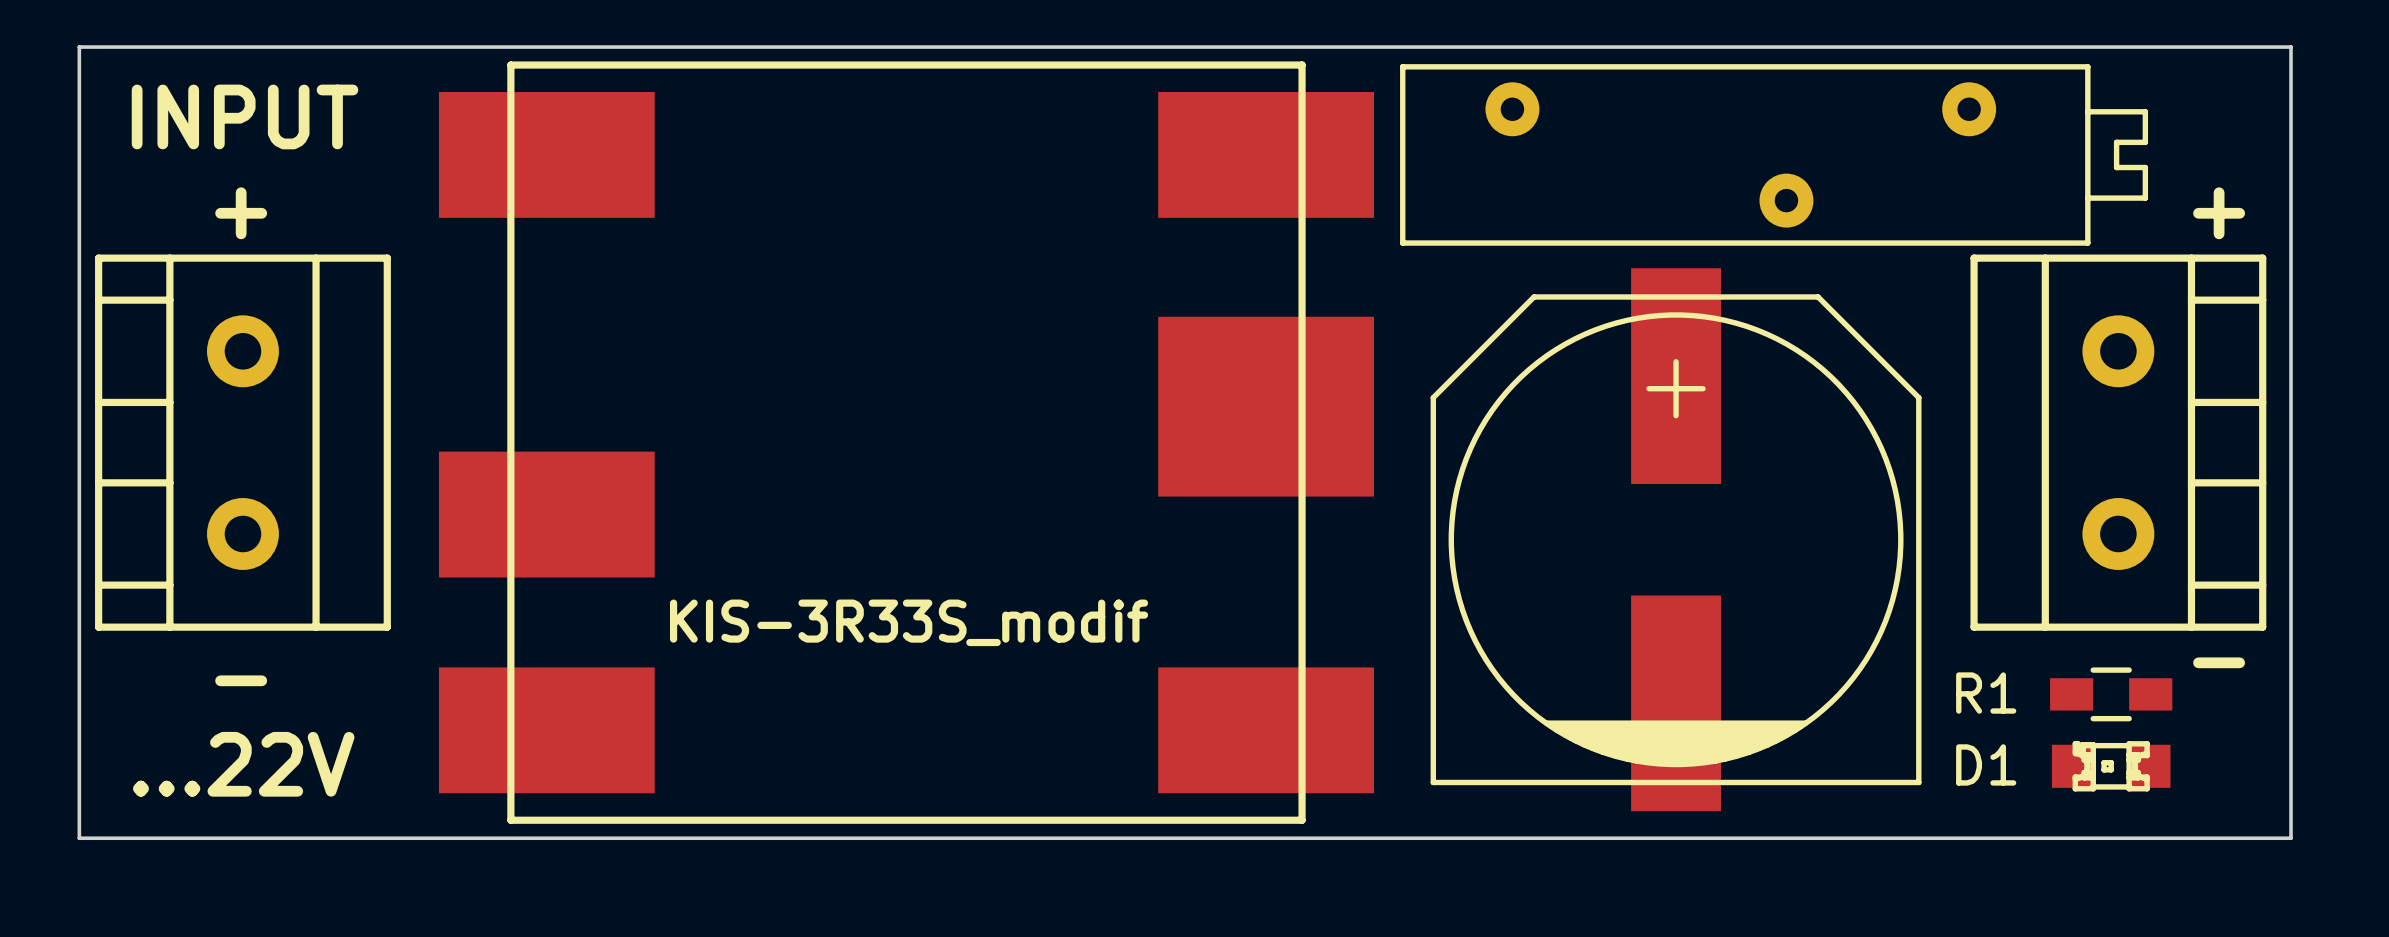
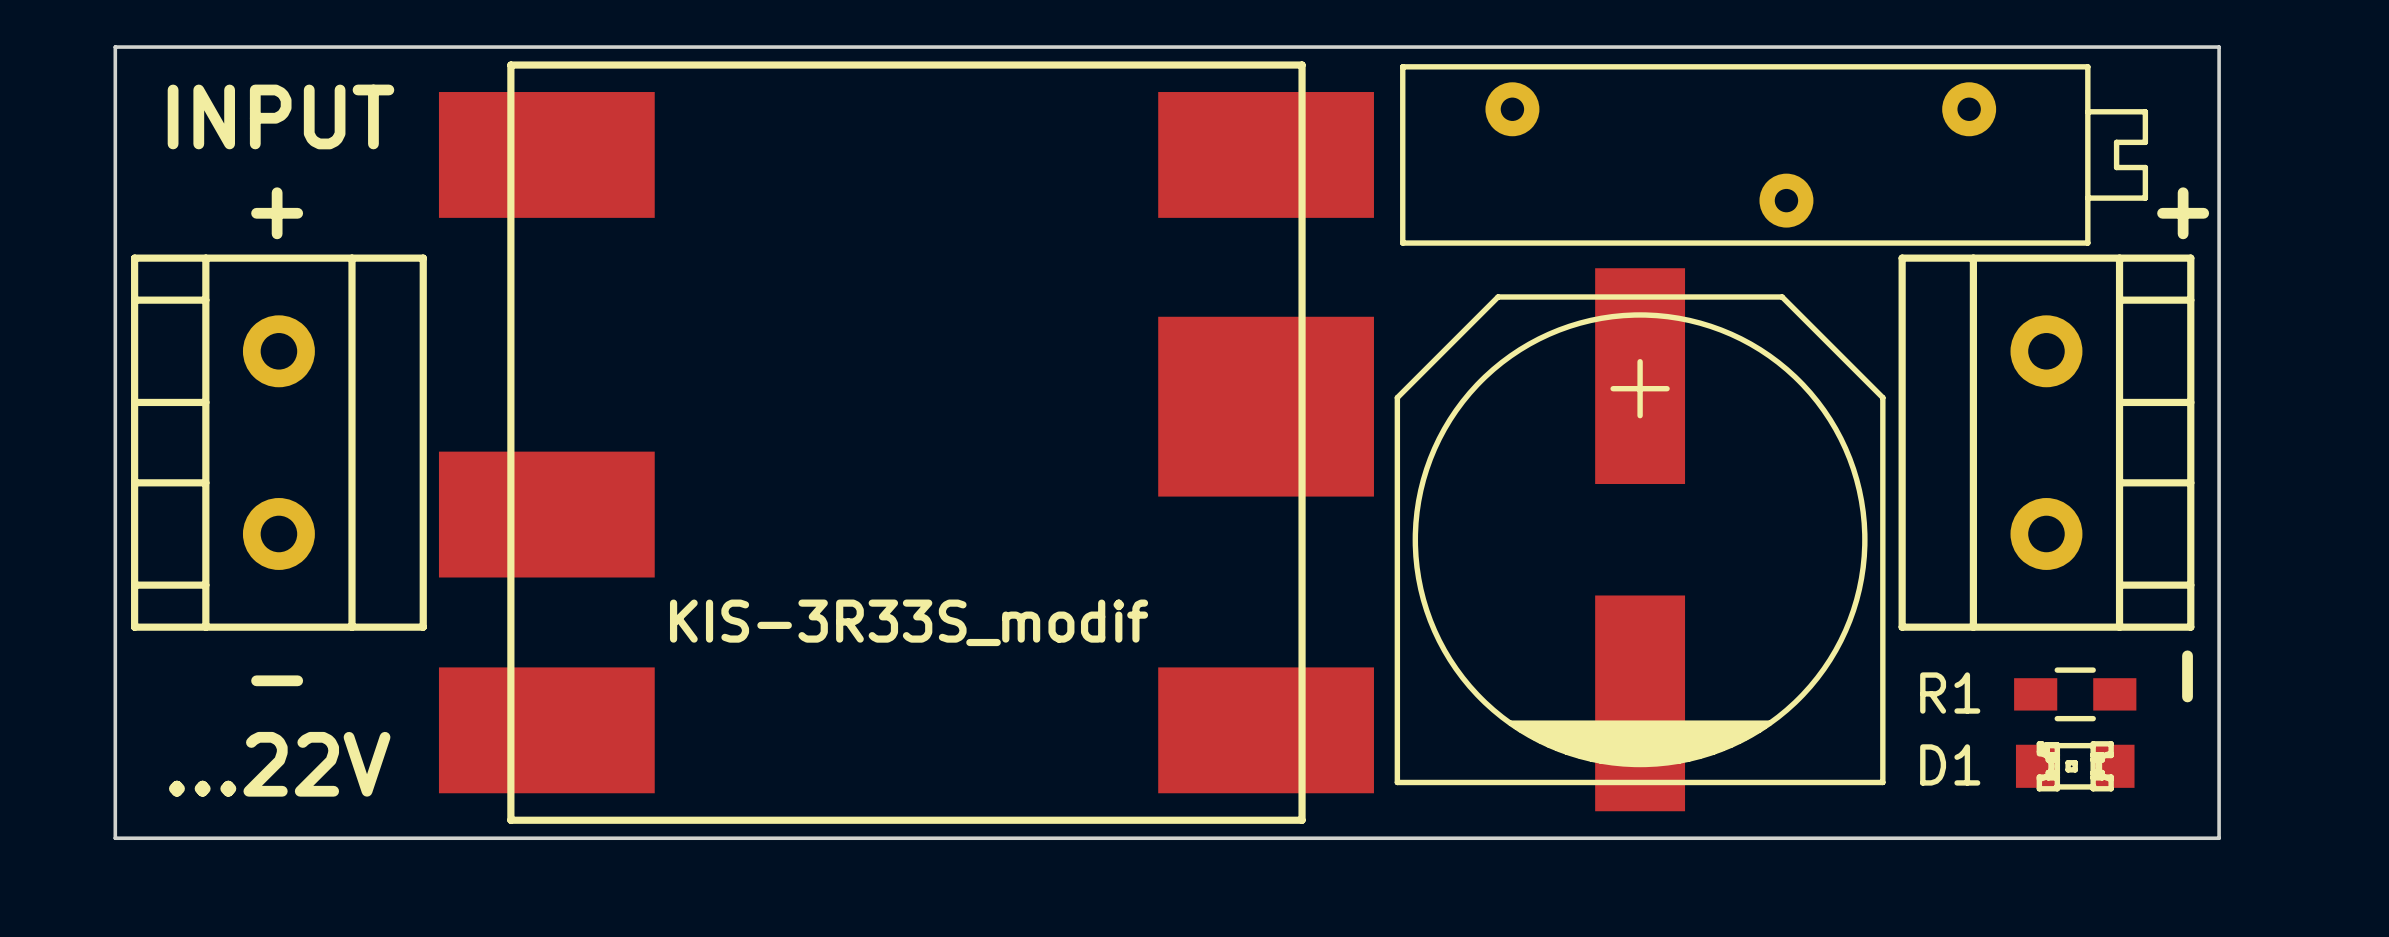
board edge: (115, 47) (79, 47) (79, 838) (115, 838) -> (115, 47) (115, 838)
board edge: (2219, 47) (2291, 47) (2291, 838) (2219, 838) -> (2219, 47) (2219, 838)
text position: INPUT (245, 116) -> INPUT (280, 116)
text position: + (241, 213) -> + (277, 213)
text position: + (2219, 213) -> + (2183, 213)
part position: (242, 442) -> (278, 442)
part position: (2118, 442) -> (2046, 442)
part position: (1676, 539) -> (1640, 539)
text rotation: 0° (2219, 662) -> 90° counterclockwise (2187, 676)
text position: - (241, 680) -> - (277, 680)
R1 position: (2111, 694) -> (2075, 694)
text position: ...22V (243, 764) -> ...22V (279, 764)
D1 position: (2111, 766) -> (2075, 766)

